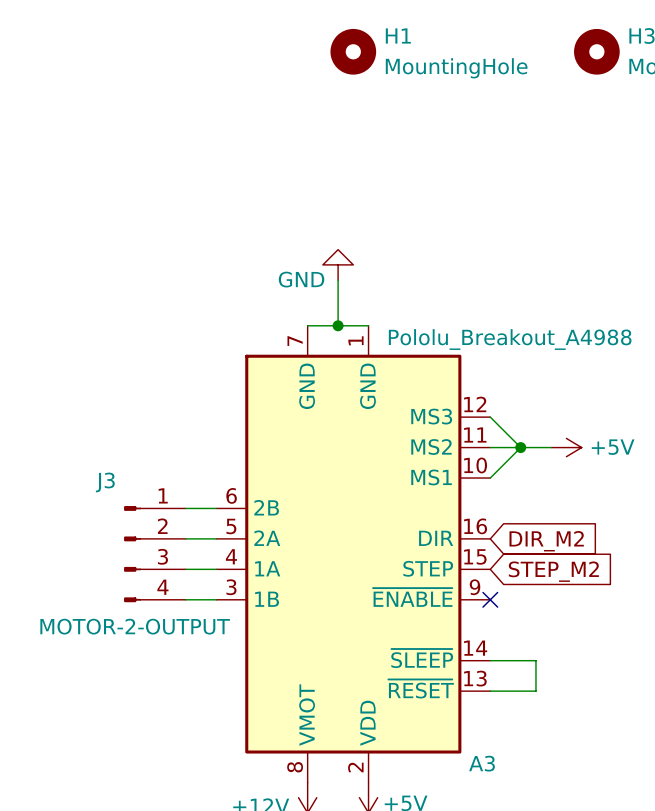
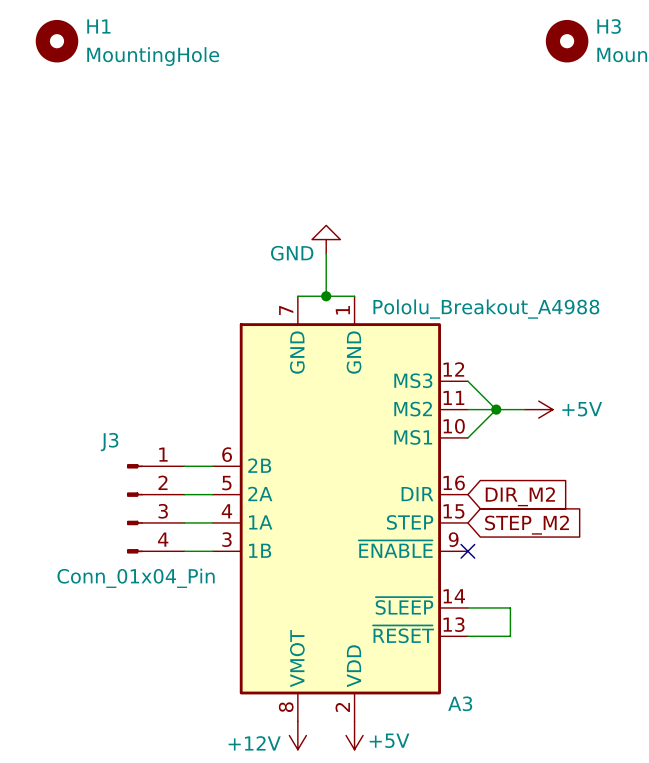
H1 position: (353, 51) -> (56, 41)
J3 value: MOTOR-2-OUTPUT (135, 626) -> Conn_01x04_Pin (136, 578)

